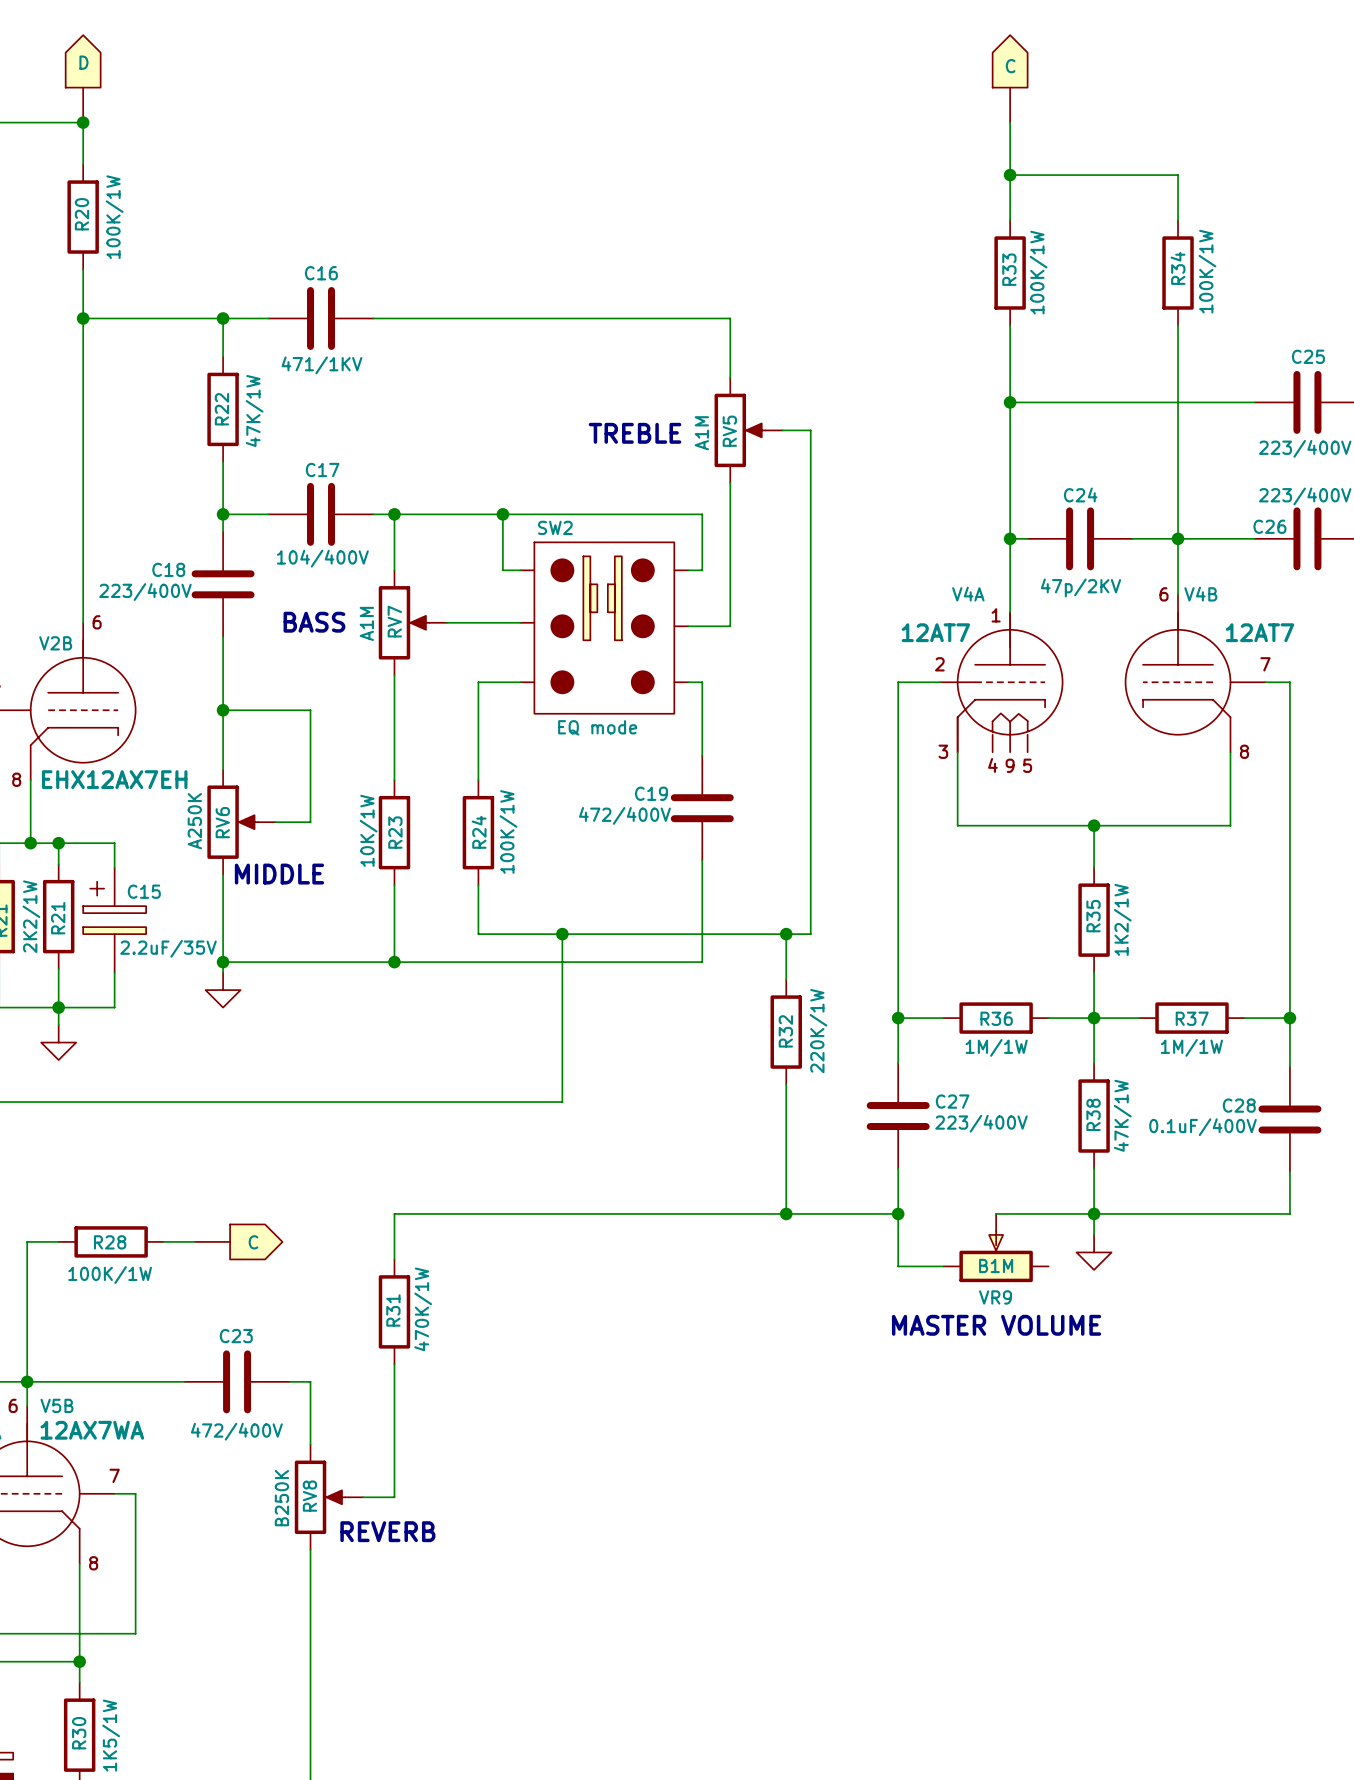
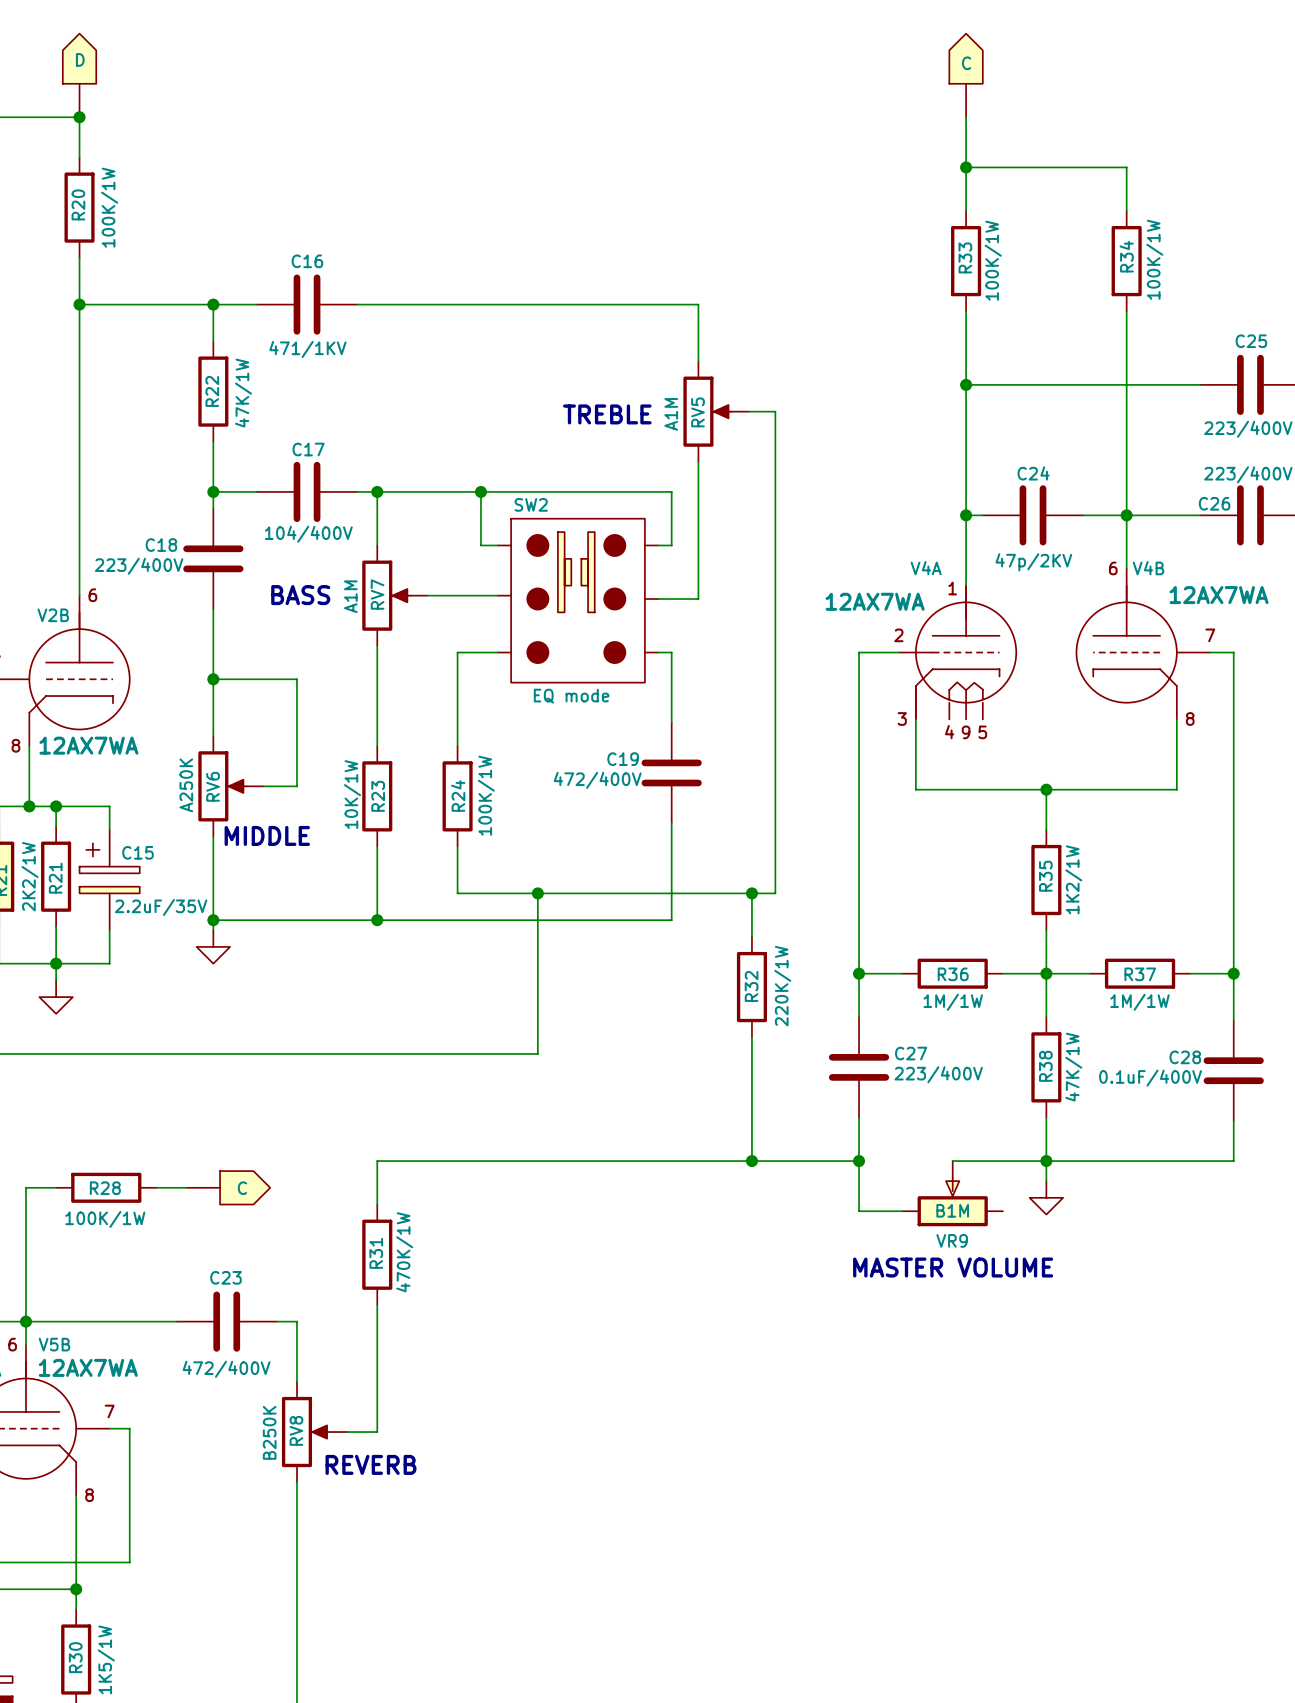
V4A value: 12AT7 (935, 632) -> 12AX7WA (875, 601)
V4B value: 12AT7 (1260, 632) -> 12AX7WA (1219, 595)
V2B value: EHX12AX7EH (114, 779) -> 12AX7WA (88, 745)

